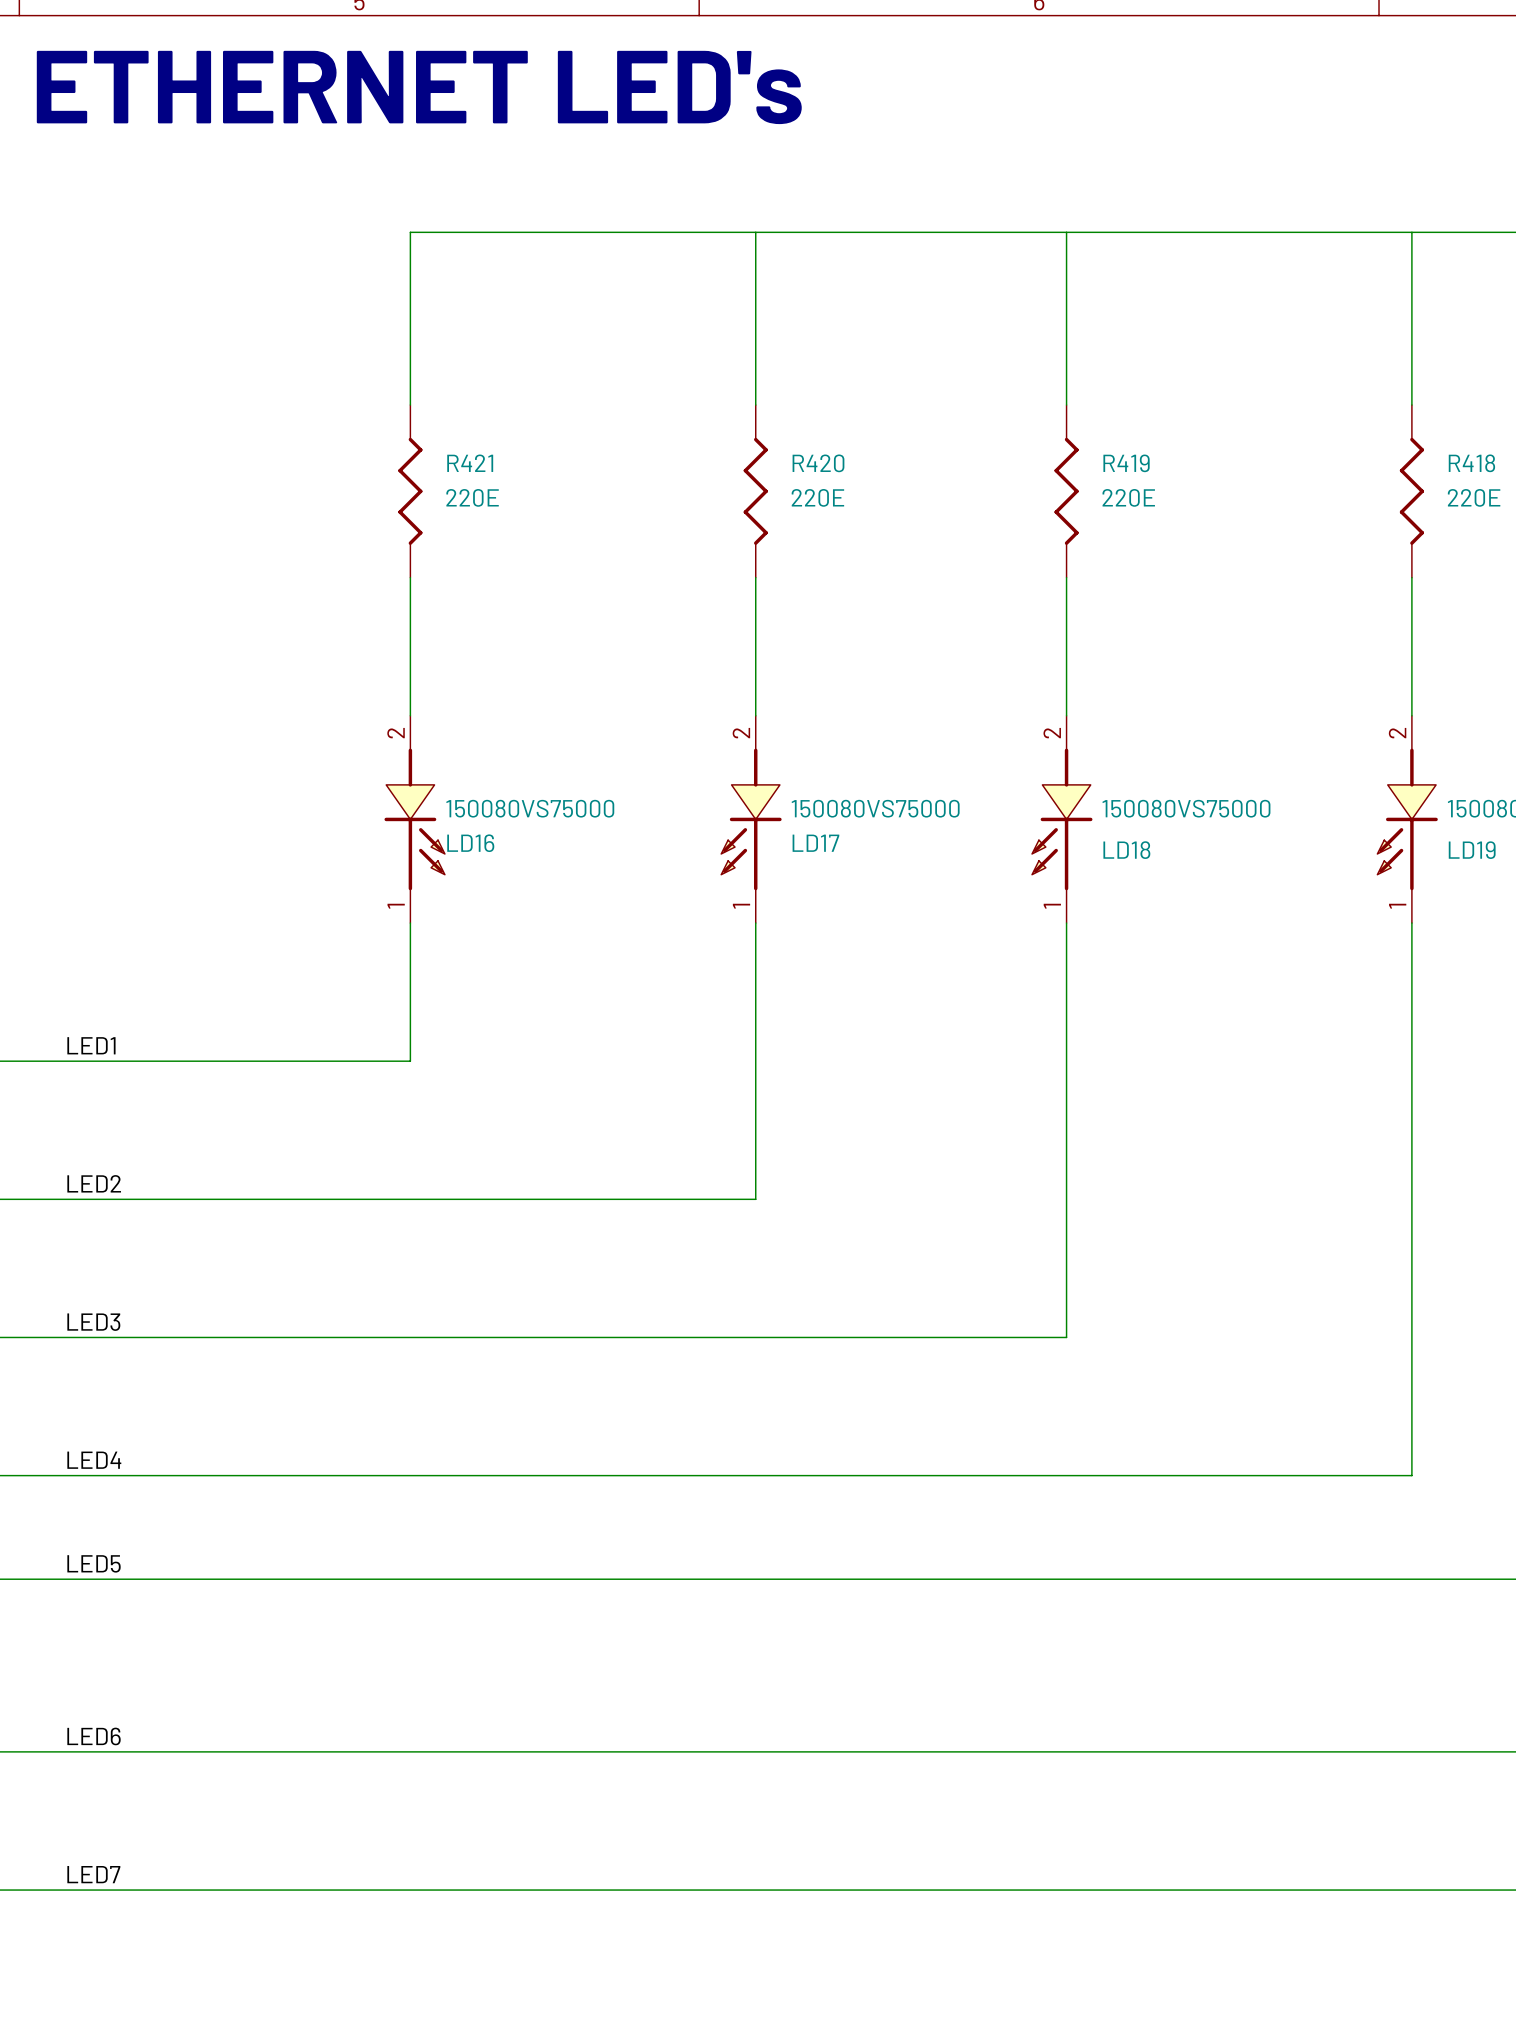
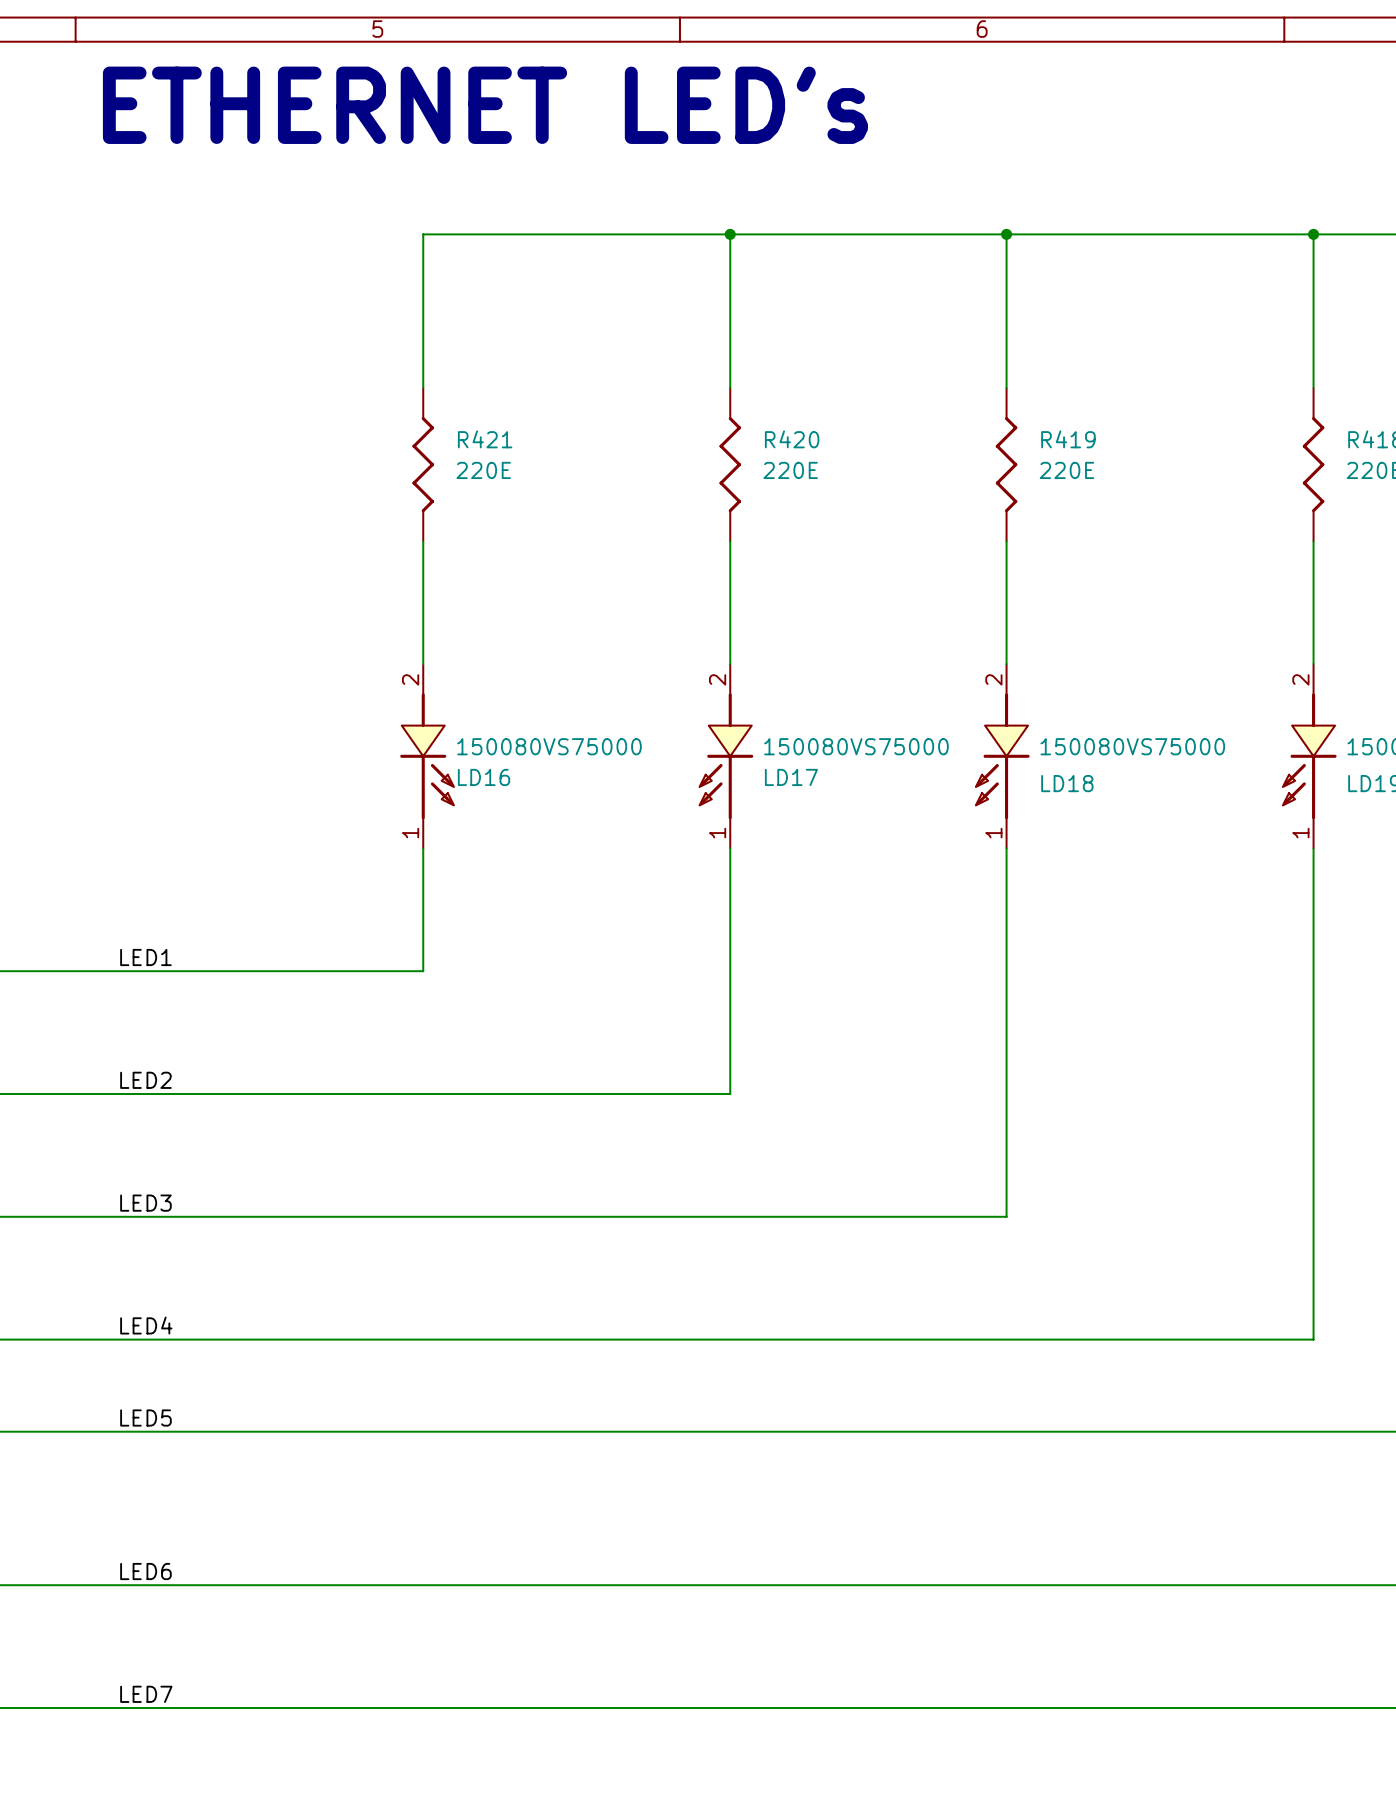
junction: none -> (730, 234)
junction: none -> (1006, 234)
junction: none -> (1313, 234)

